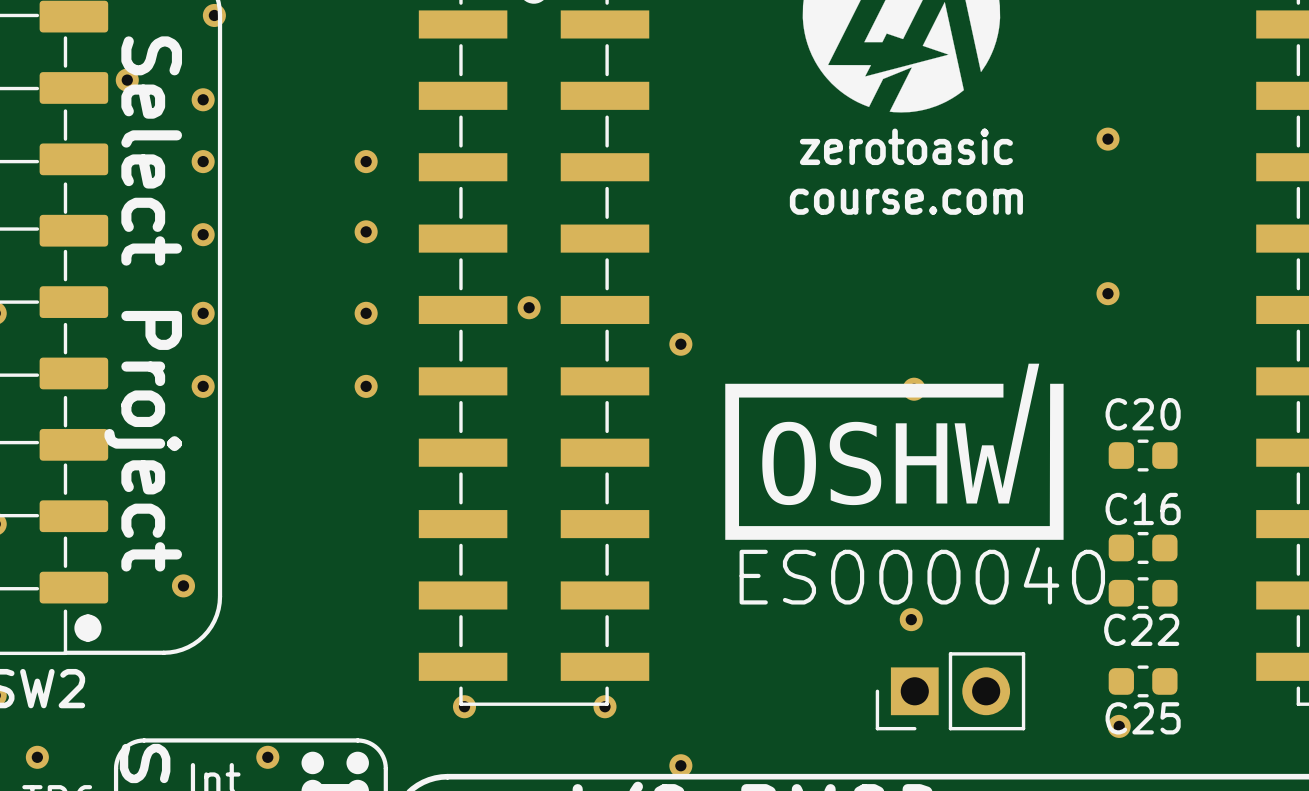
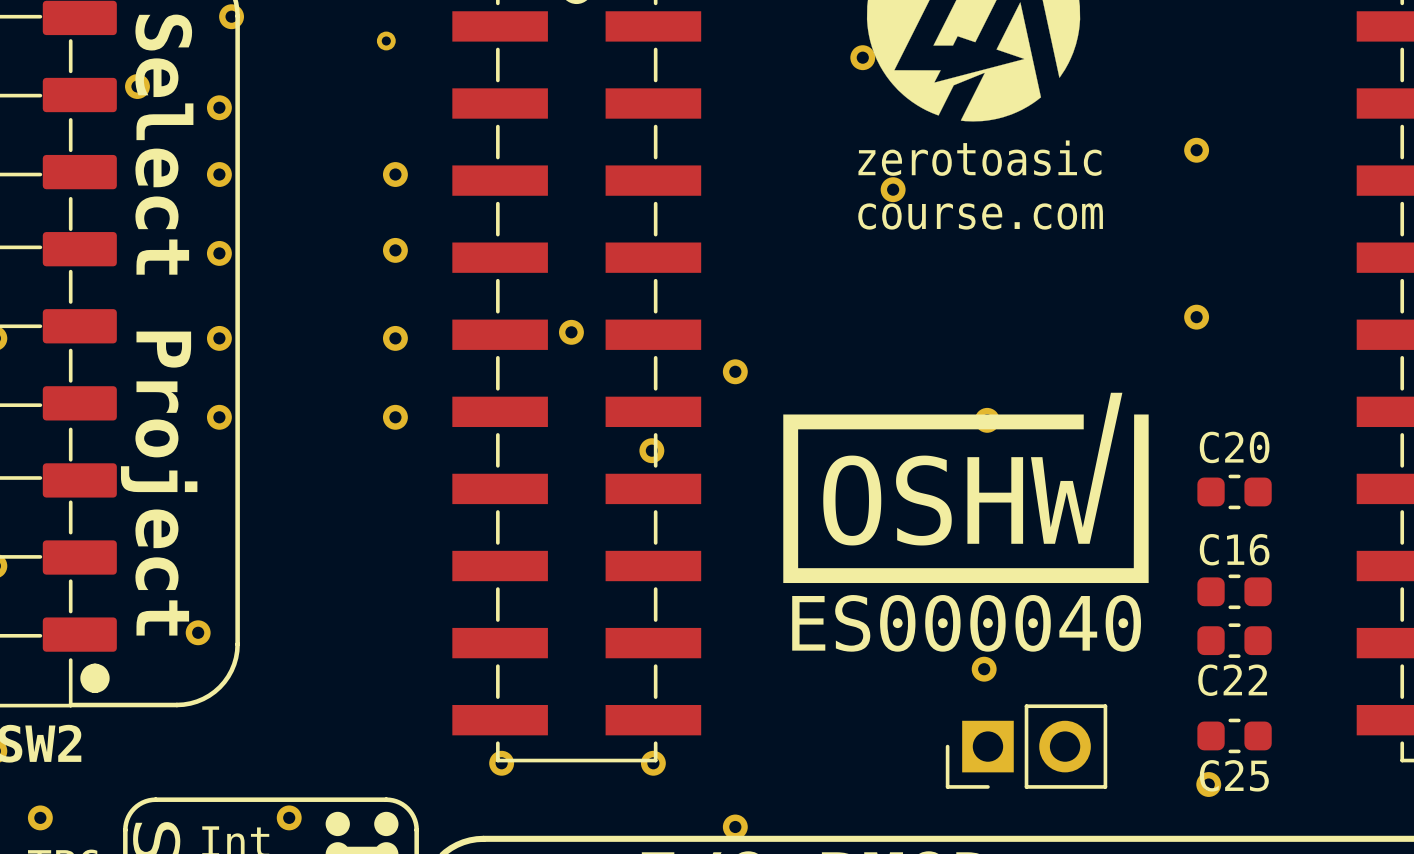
part: none -> (386, 40)
part: none -> (862, 57)
part: none -> (893, 189)
part: none -> (651, 450)

